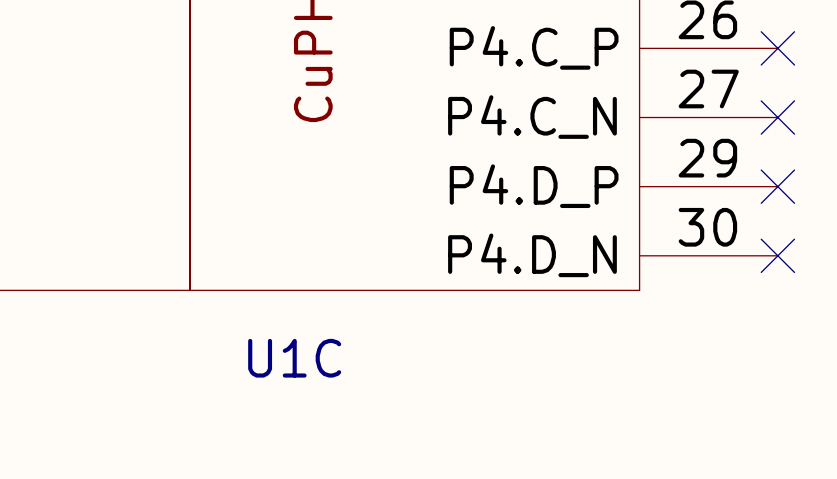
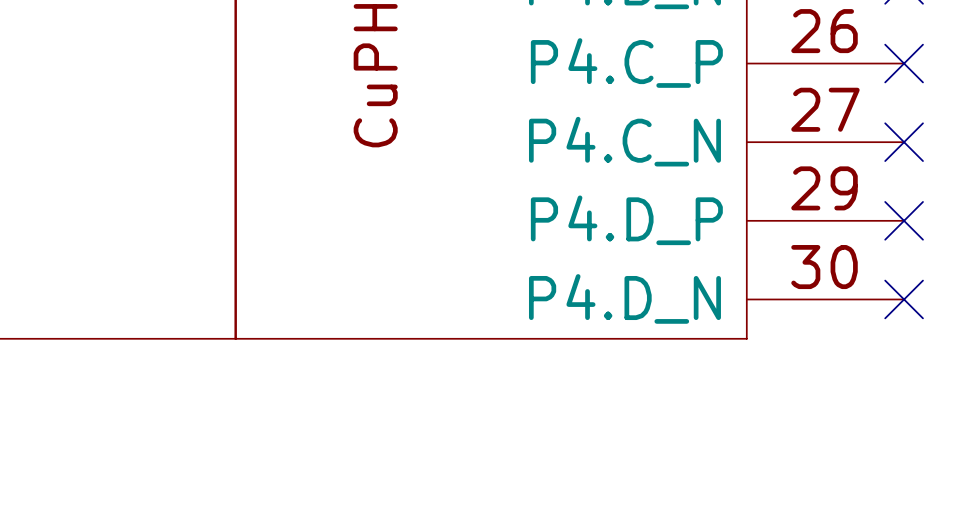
U1C name: U1C (294, 358) -> none

